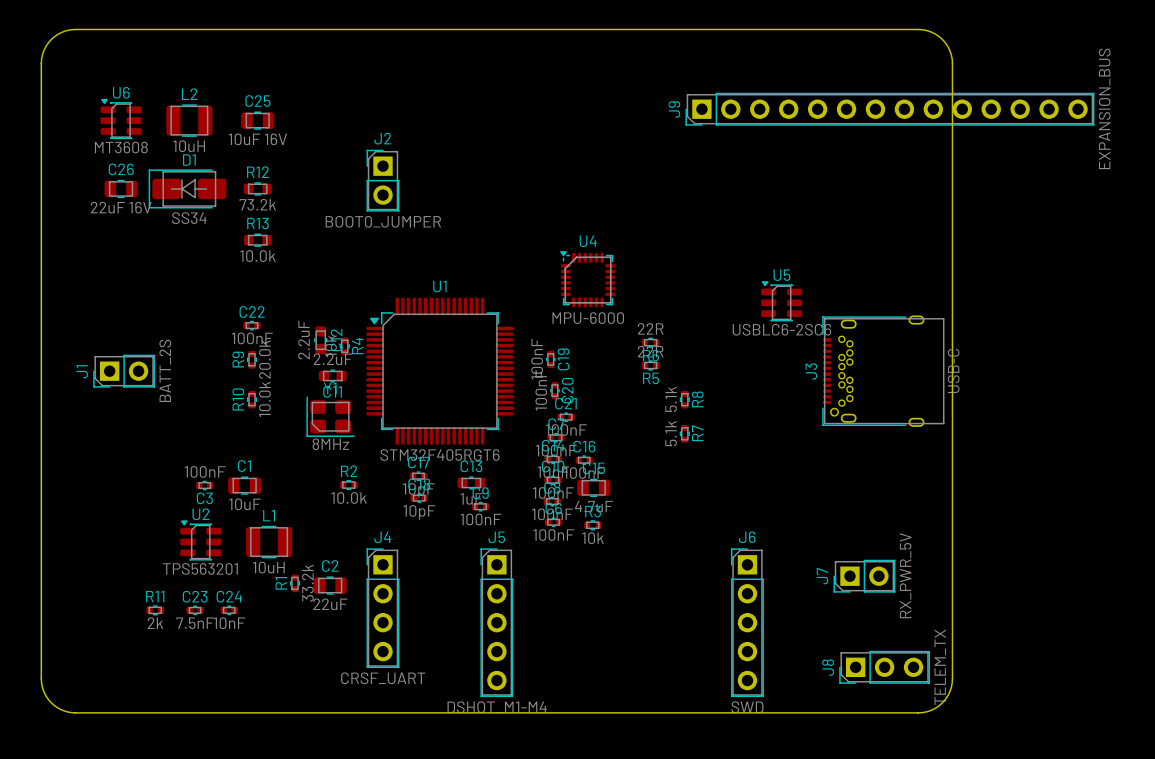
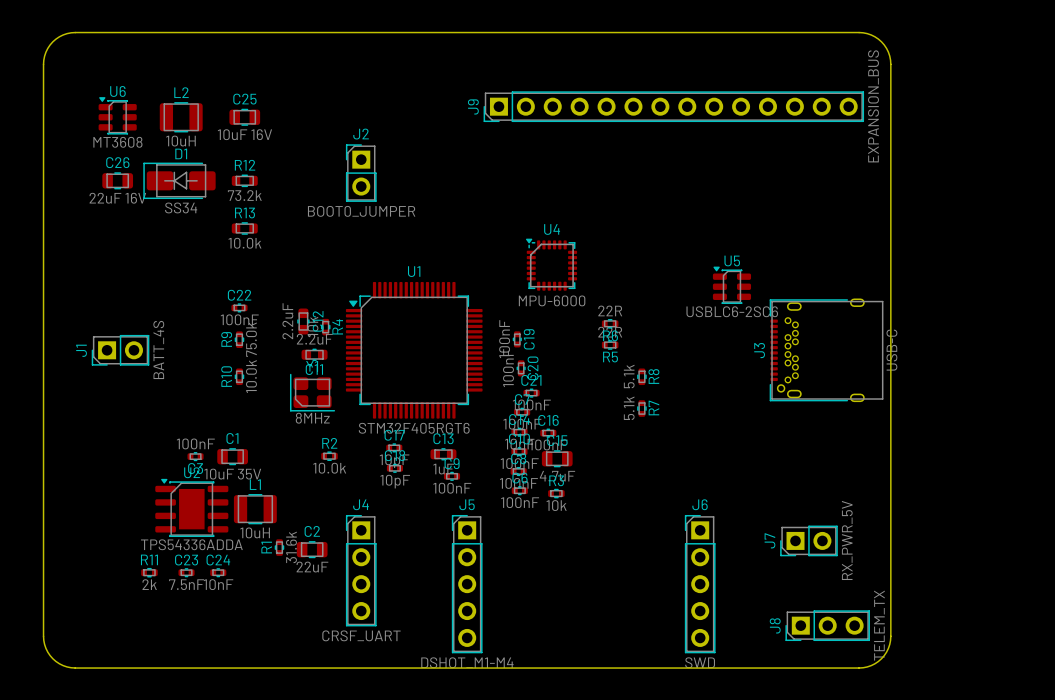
J9 position: (889, 109) -> (673, 106)
R9 value: 20.0k (264, 359) -> 75.0k (251, 339)
J1 value: BATT_2S (165, 370) -> BATT_4S (158, 349)
C1 value: 10uF (244, 504) -> 10uF 35V (232, 474)
U2 footprint: [180, 520, 222, 561] -> [155, 478, 229, 537]
U2 value: TPS563201 (200, 568) -> TPS54336ADDA (191, 544)
R1 value: 33.2k (307, 583) -> 31.6k (291, 547)

